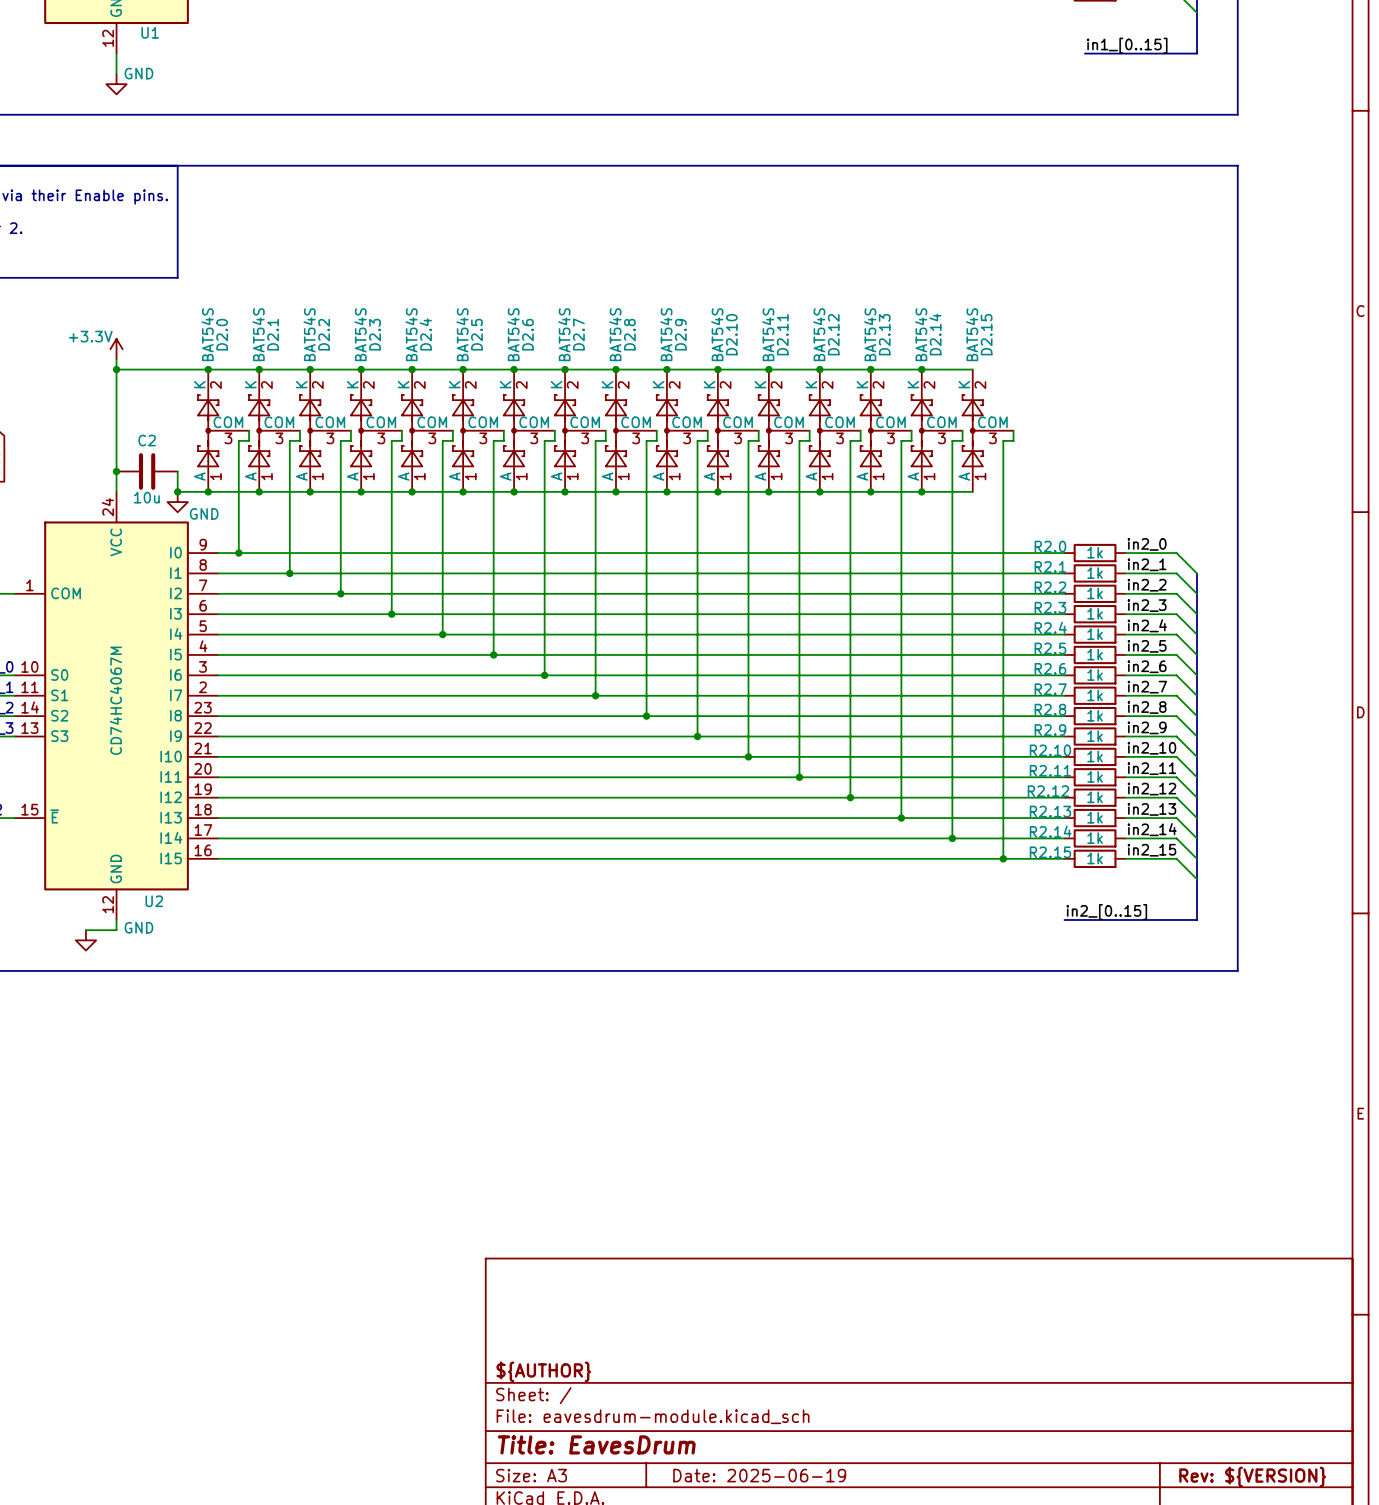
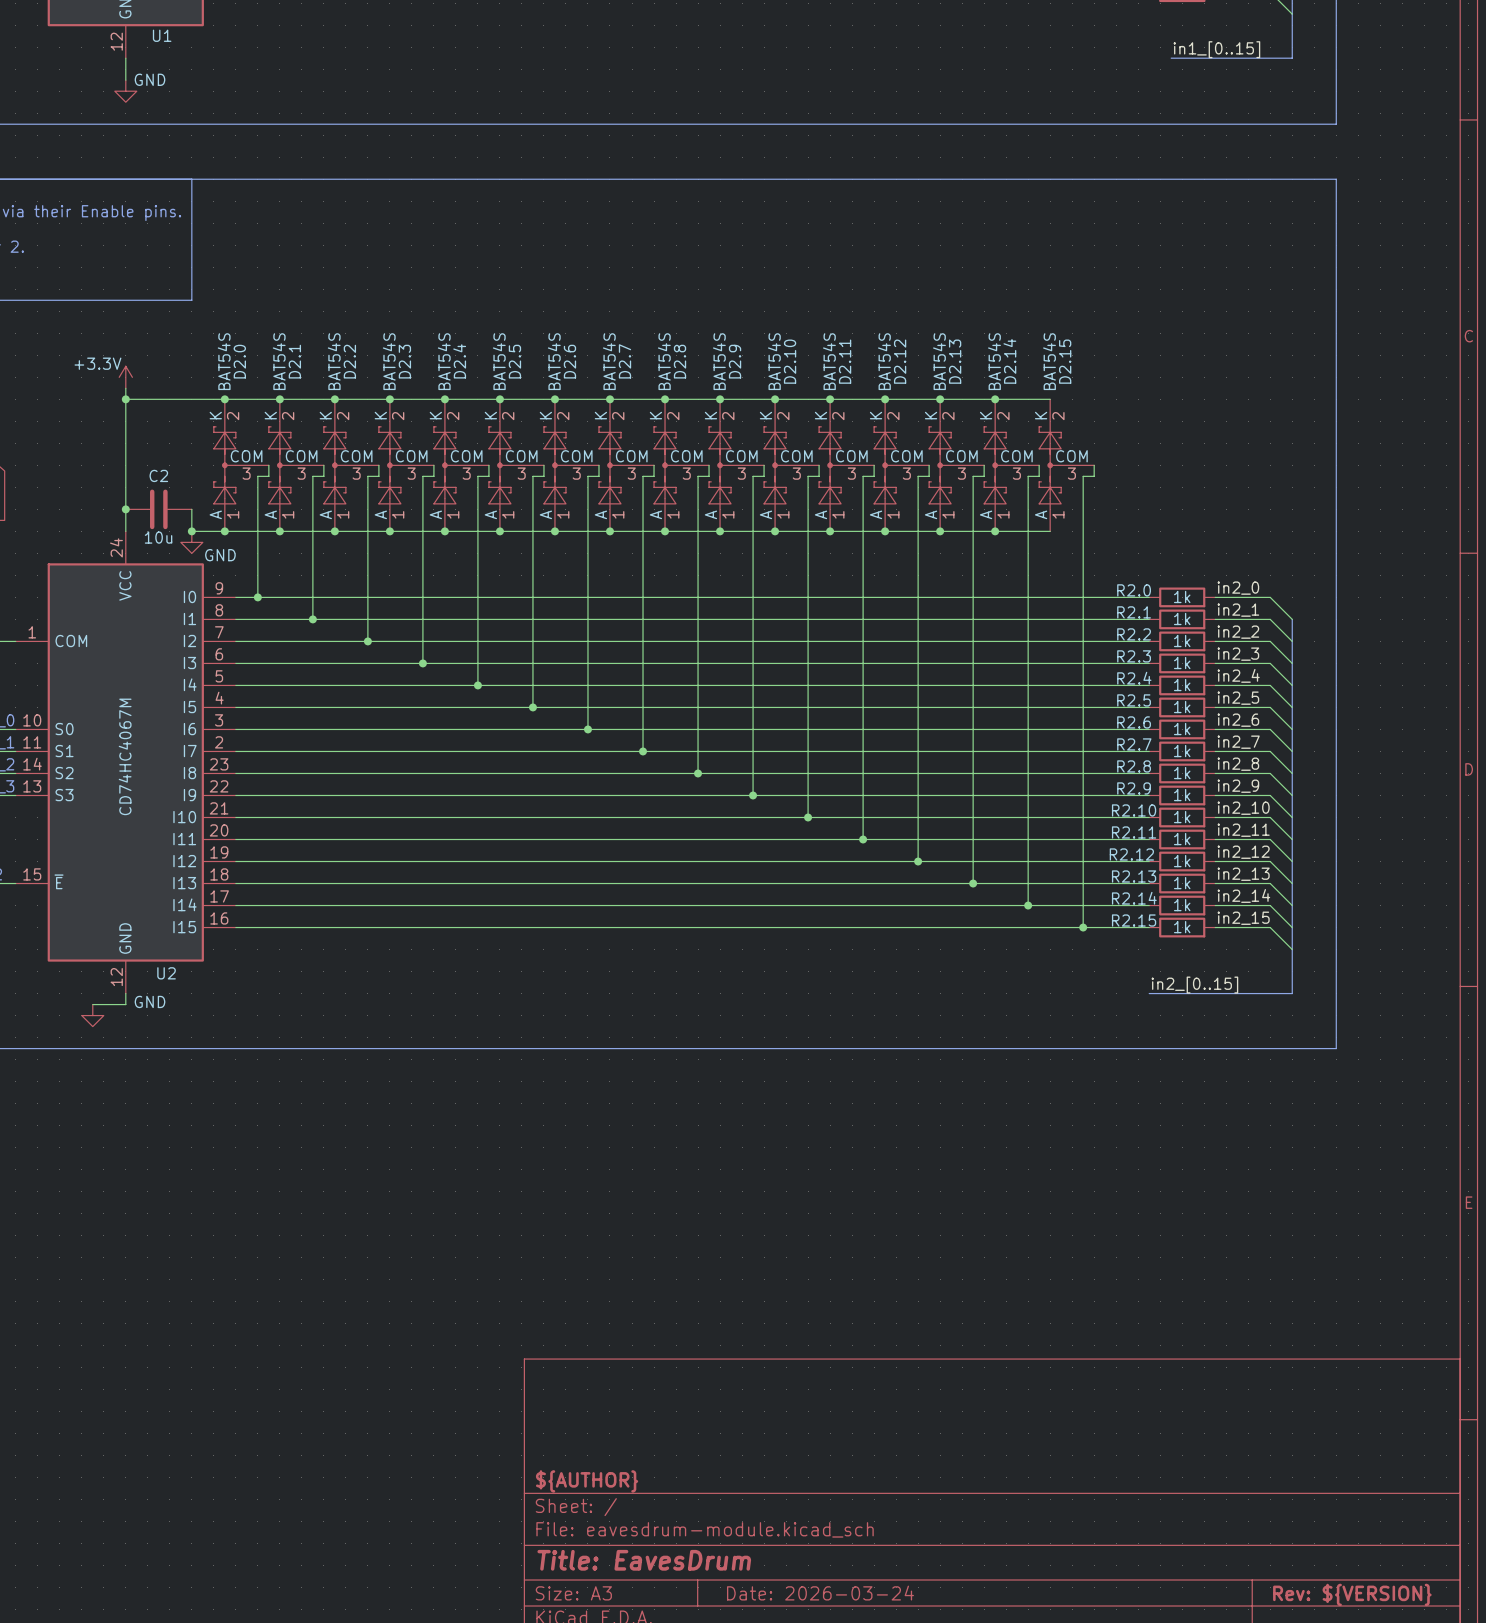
title block: Date: 2025-06-19 (759, 1475) -> Date: 2026-03-24 (820, 1593)

